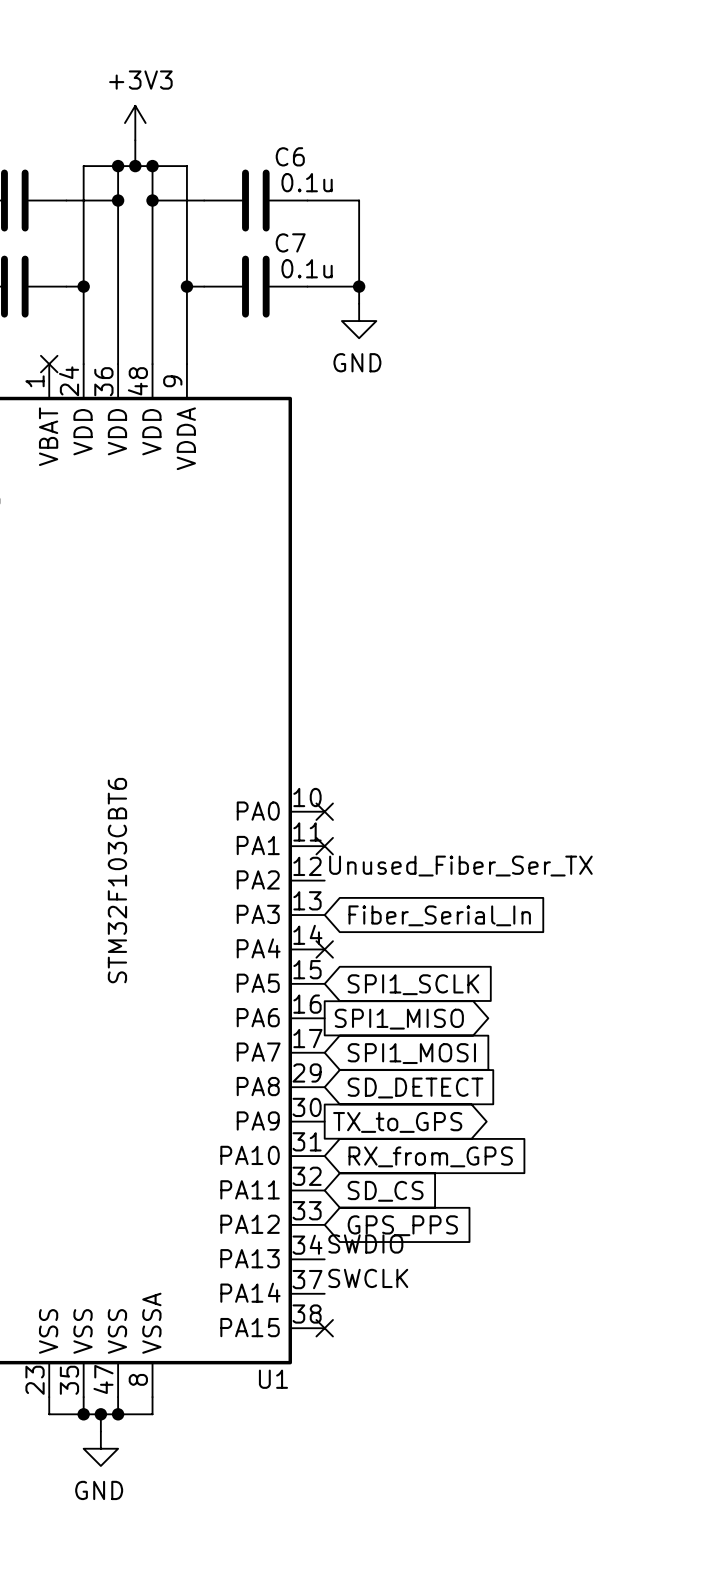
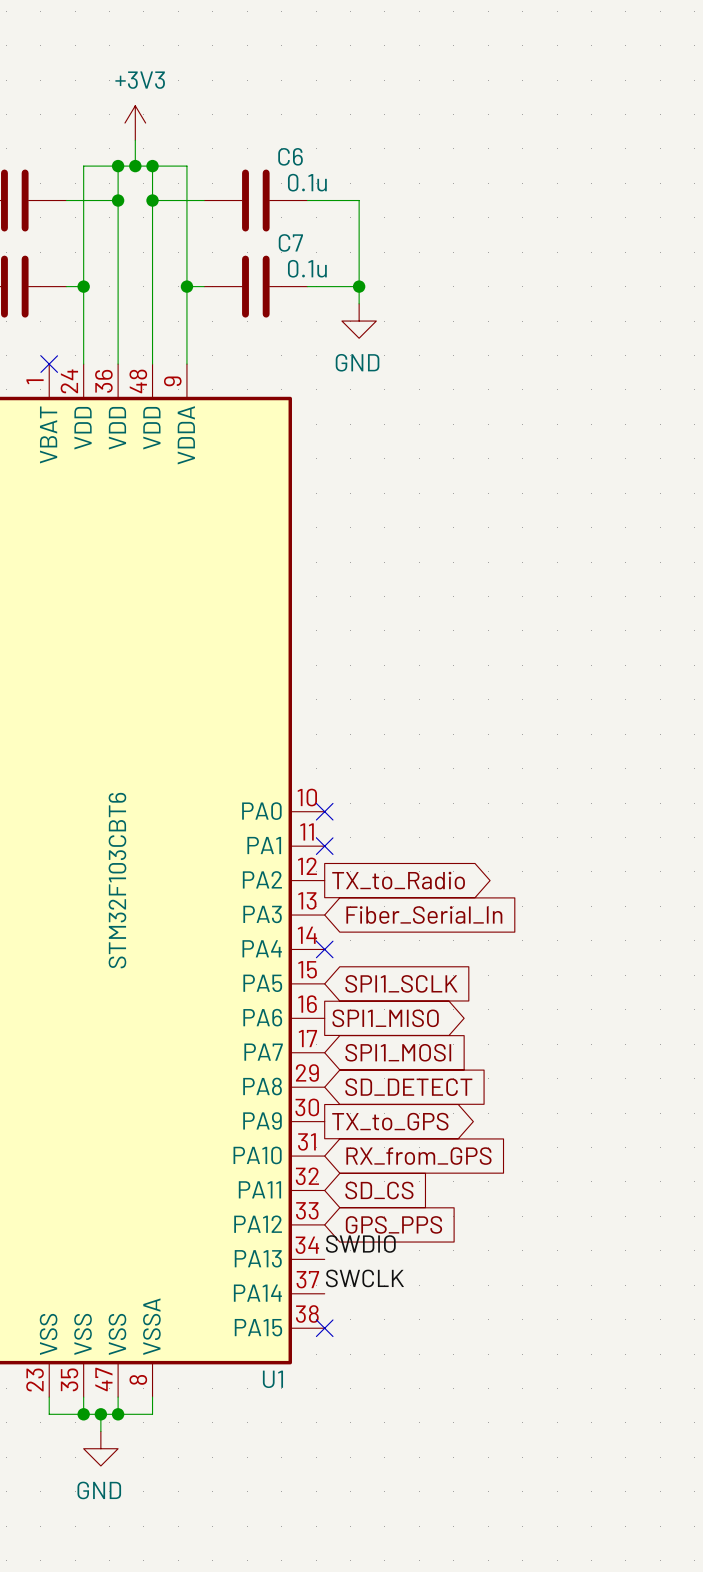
label: Unused_Fiber_Ser_TX (460, 866) -> none
global label: none -> TX_to_Radio (398, 880)

